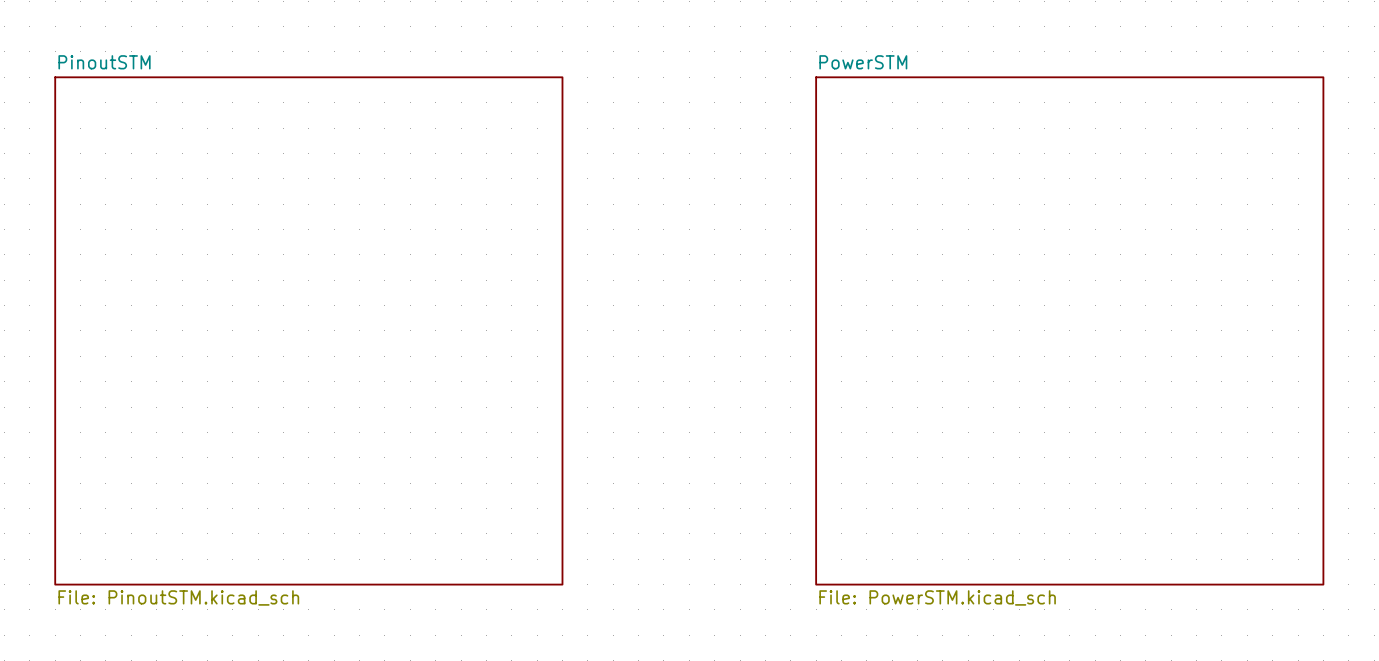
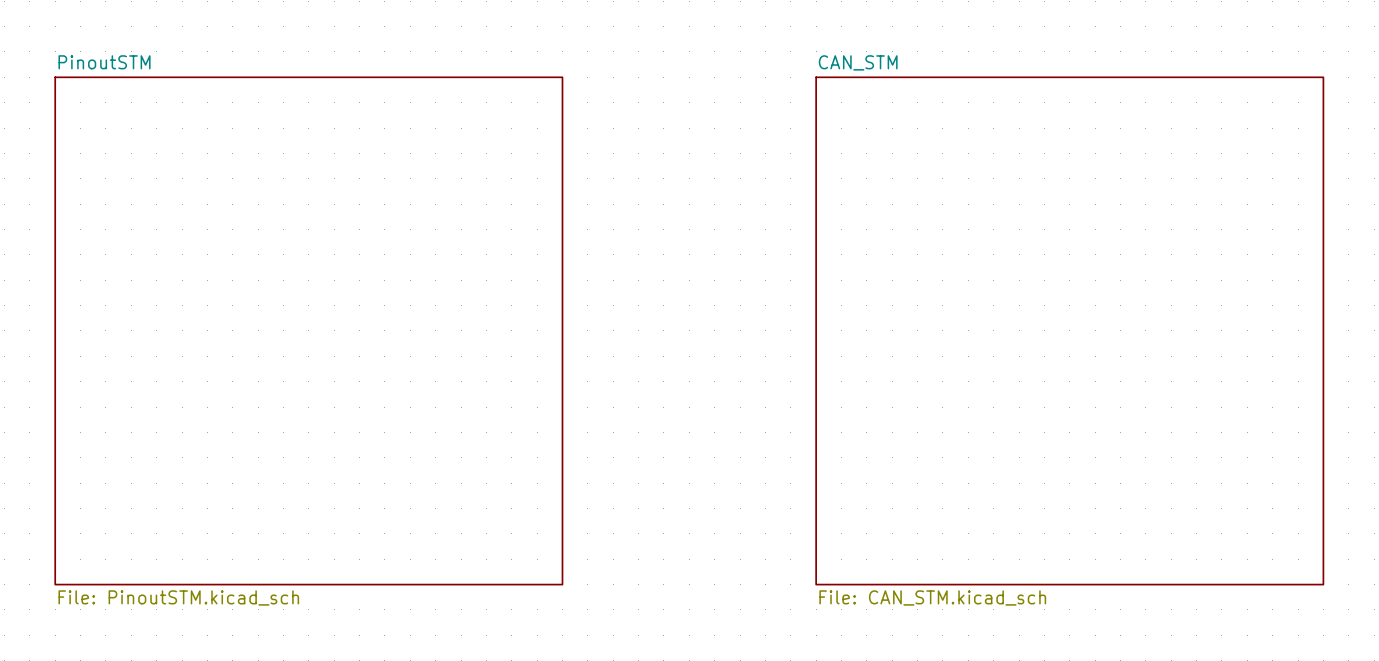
sheet PowerSTM name: PowerSTM (863, 62) -> CAN_STM (858, 62)
sheet PowerSTM value: File: PowerSTM.kicad_sch (937, 597) -> File: CAN_STM.kicad_sch (932, 597)

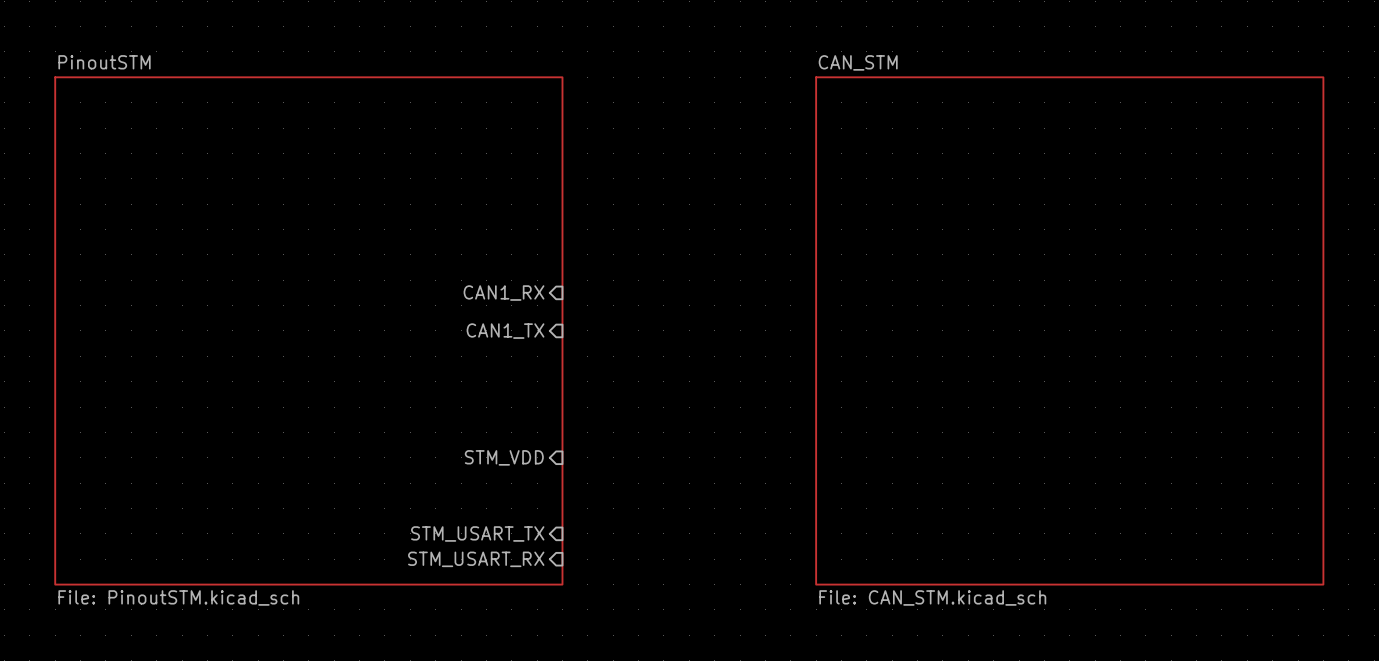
sheet pin: none -> CAN1_RX (504, 293)
sheet pin: none -> CAN1_TX (505, 331)
sheet pin: none -> STM_VDD (504, 457)
sheet pin: none -> STM_USART_TX (477, 533)
sheet pin: none -> STM_USART_RX (476, 559)

